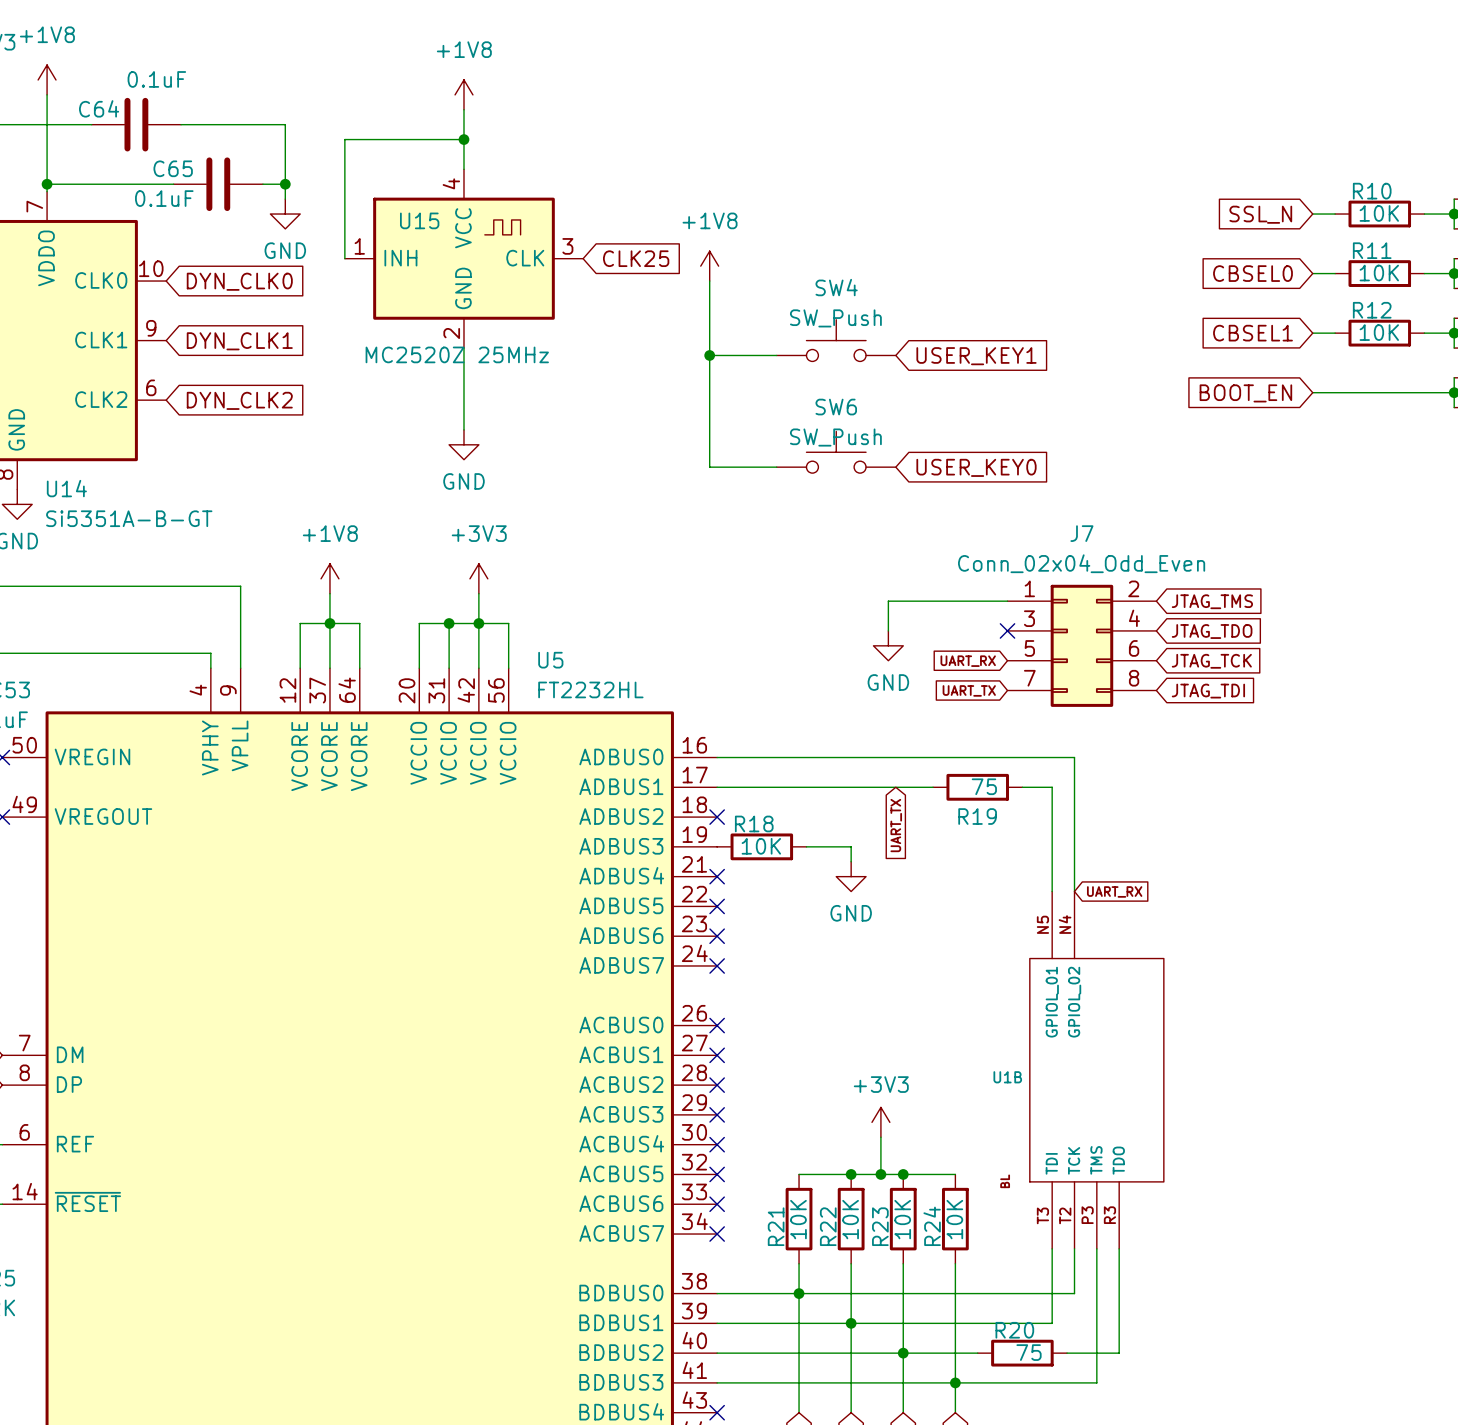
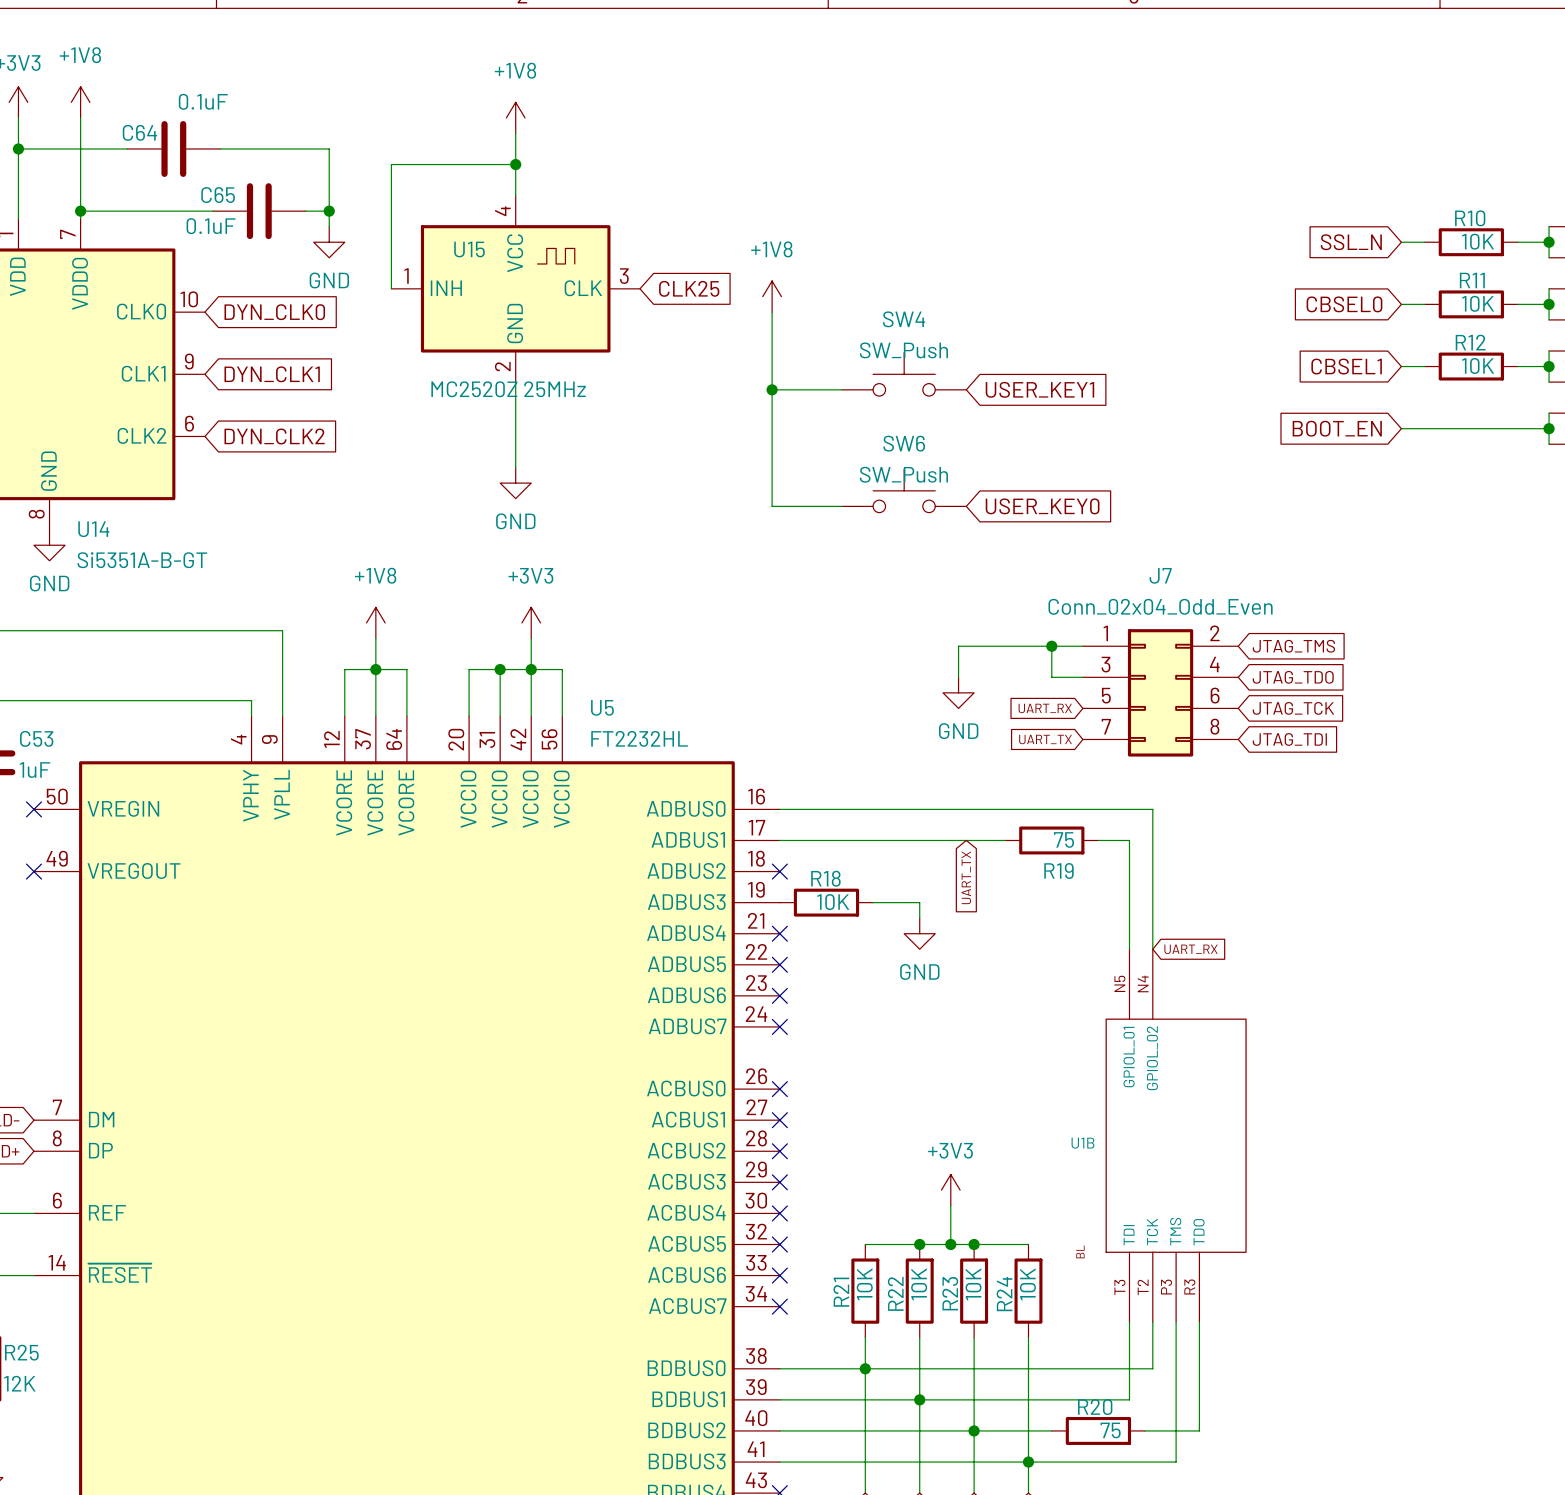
wire: none -> (1051, 646) (1051, 677) (1082, 677)
junction: none -> (1051, 646)
no-connect mark: (1007, 630) -> none

